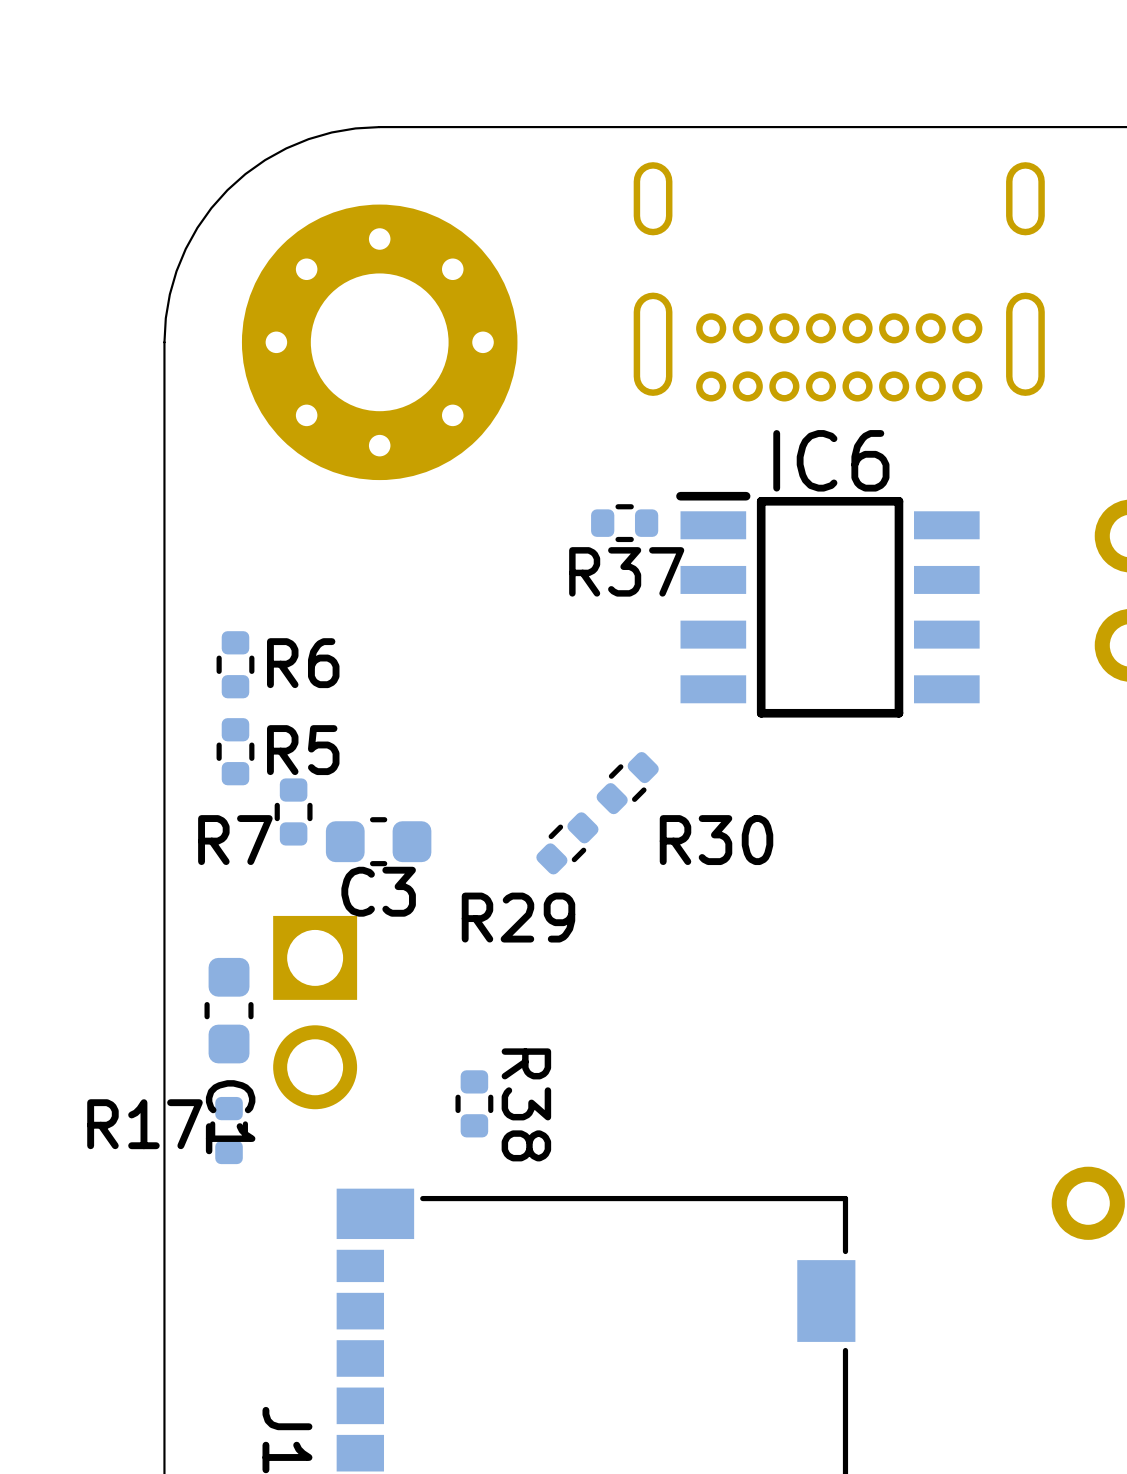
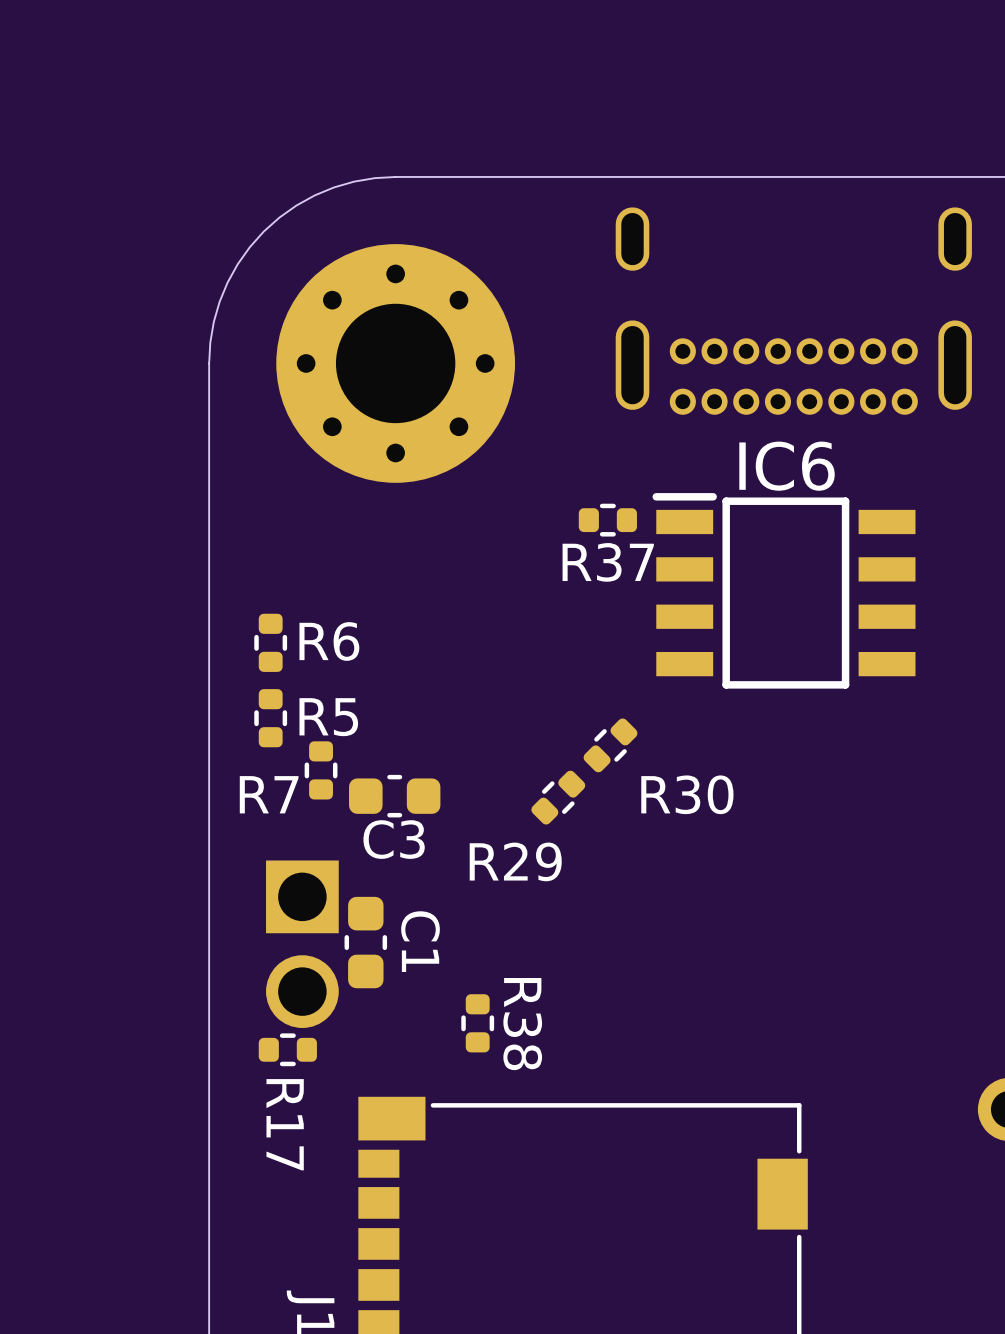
C1 position: (229, 1010) -> (365, 942)
part position: (315, 1012) -> (302, 944)
C1 name position: C1 (230, 1117) -> C1 (420, 941)
R17 name position: R17 (144, 1124) -> R17 (285, 1124)
R17 rotation: 0° (229, 1130) -> 90° clockwise (287, 1049)

